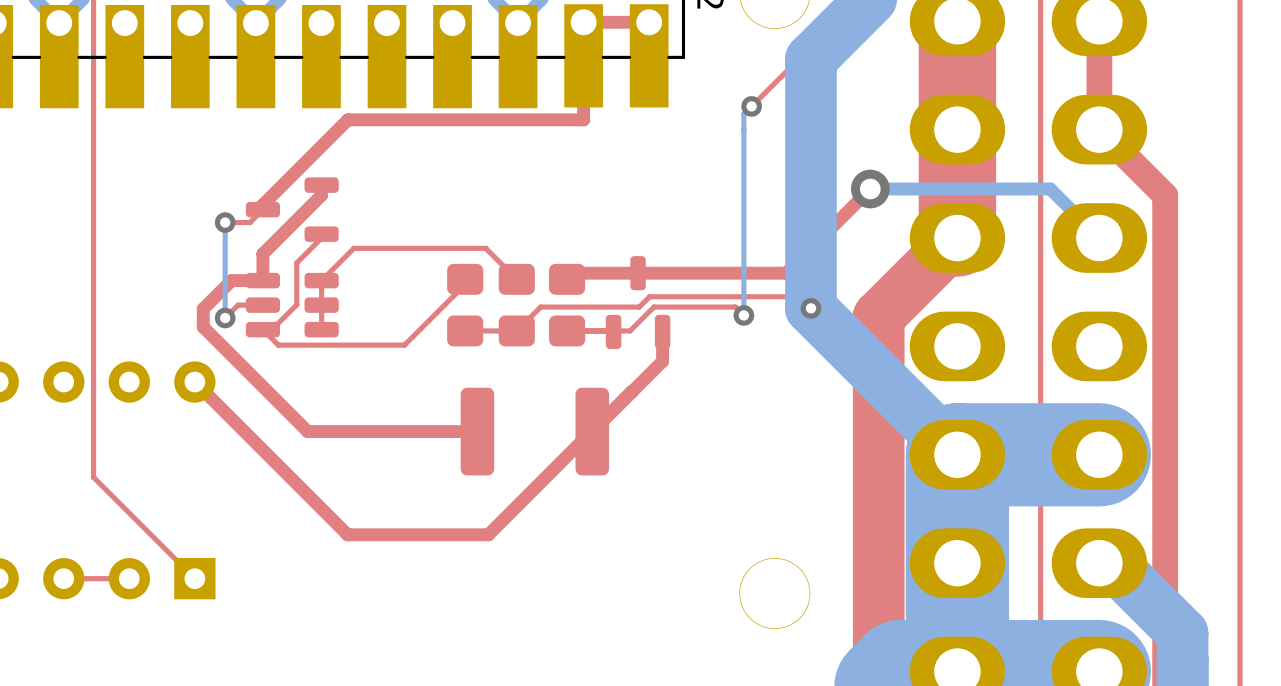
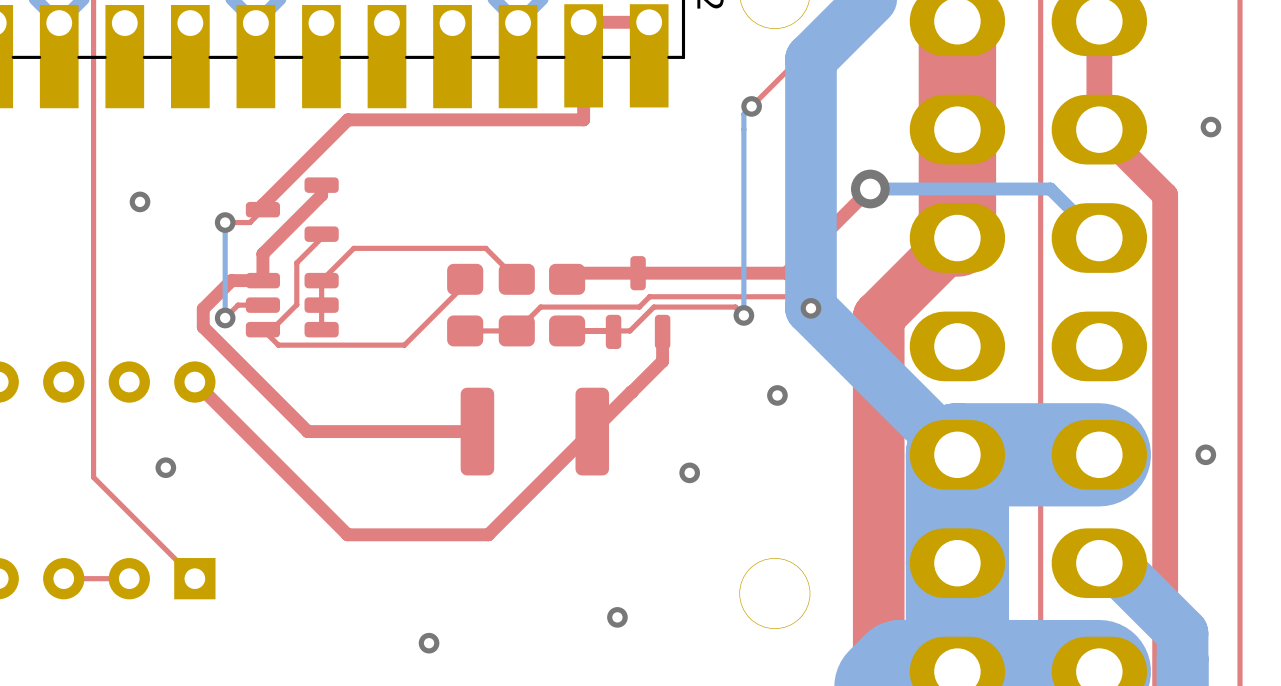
via: none -> (1210, 127)
via: none -> (140, 201)
via: none -> (777, 395)
via: none -> (1205, 454)
via: none -> (165, 467)
via: none -> (689, 472)
via: none -> (617, 617)
via: none -> (429, 643)

